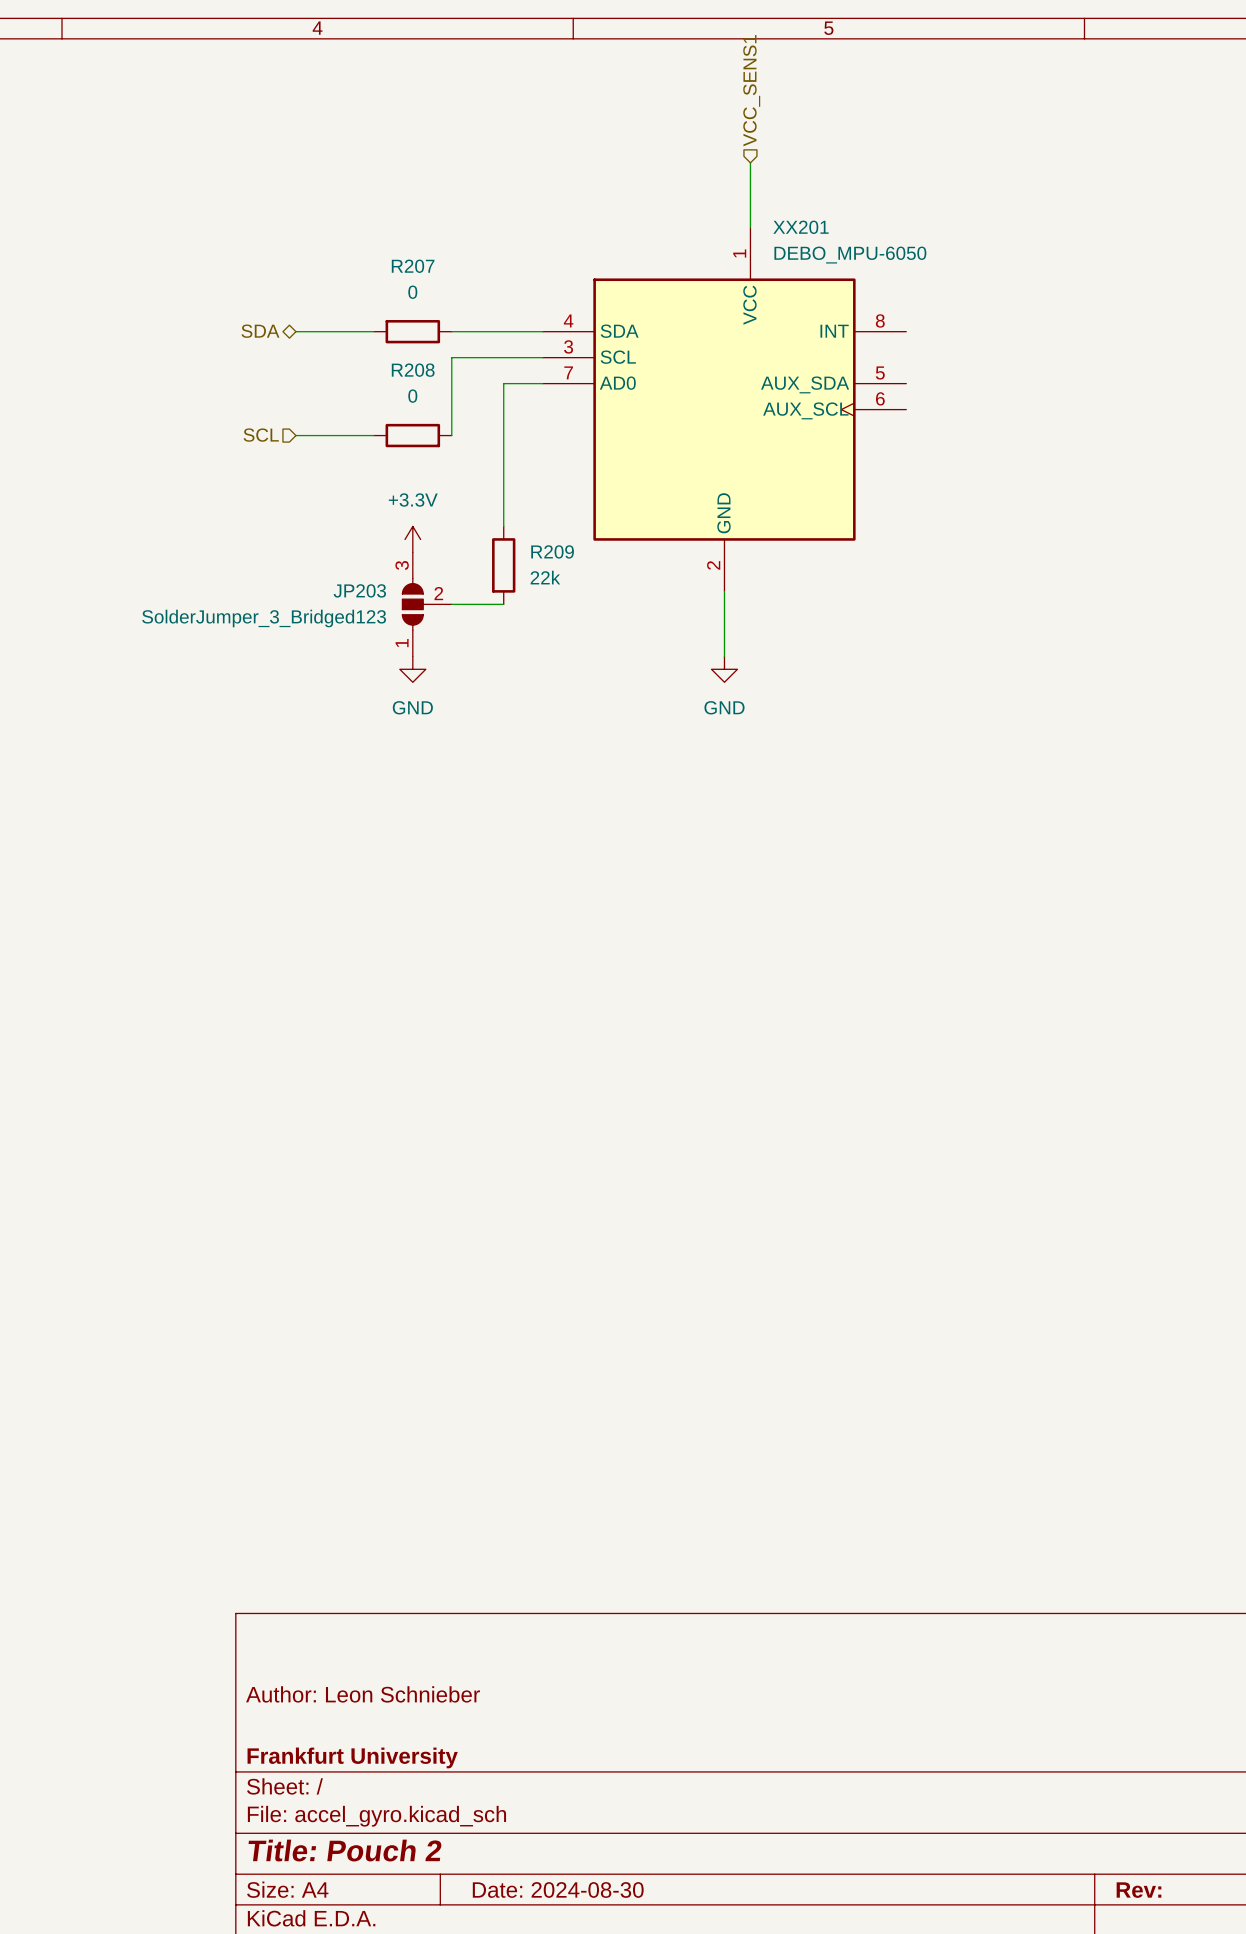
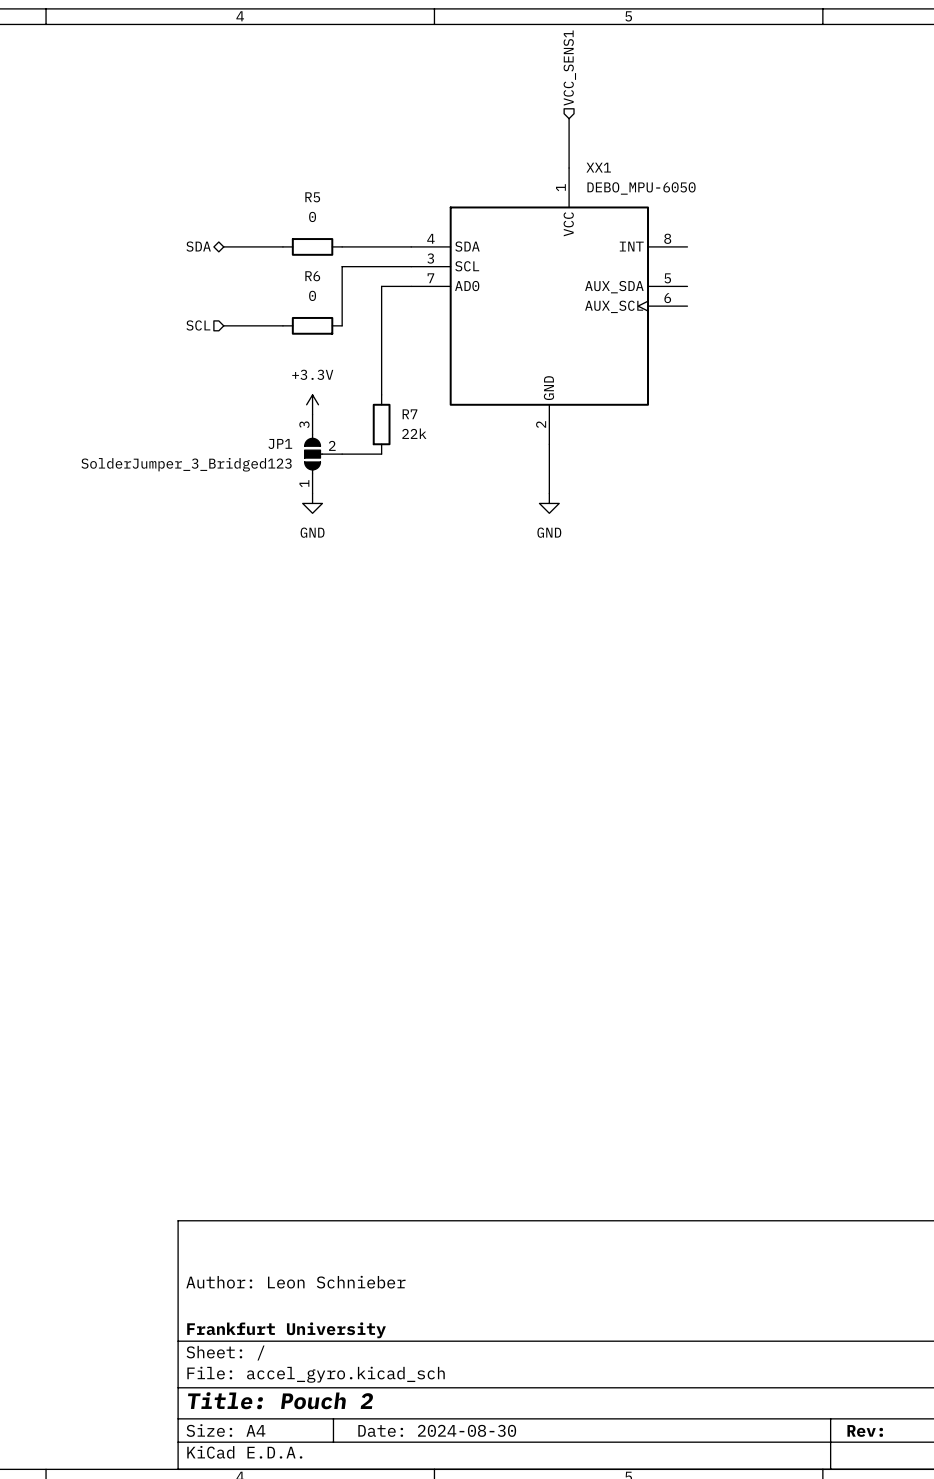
XX201 name: XX201 (800, 227) -> XX1 (598, 167)
R207 name: R207 (413, 266) -> R5 (312, 197)
R208 name: R208 (413, 370) -> R6 (312, 276)
R209 name: R209 (552, 551) -> R7 (409, 414)
JP203 name: JP203 (359, 590) -> JP1 (280, 443)

